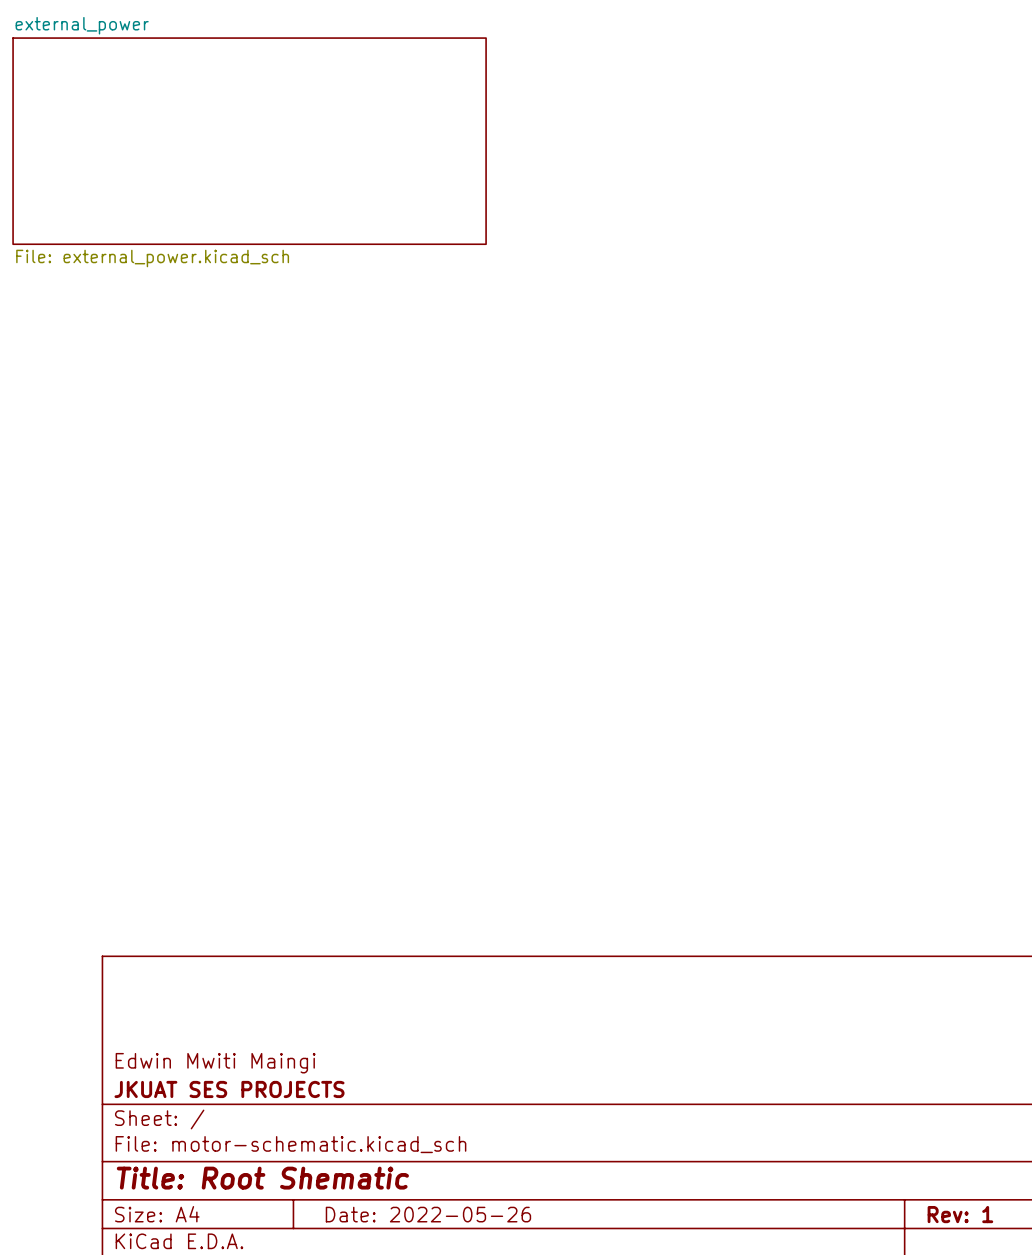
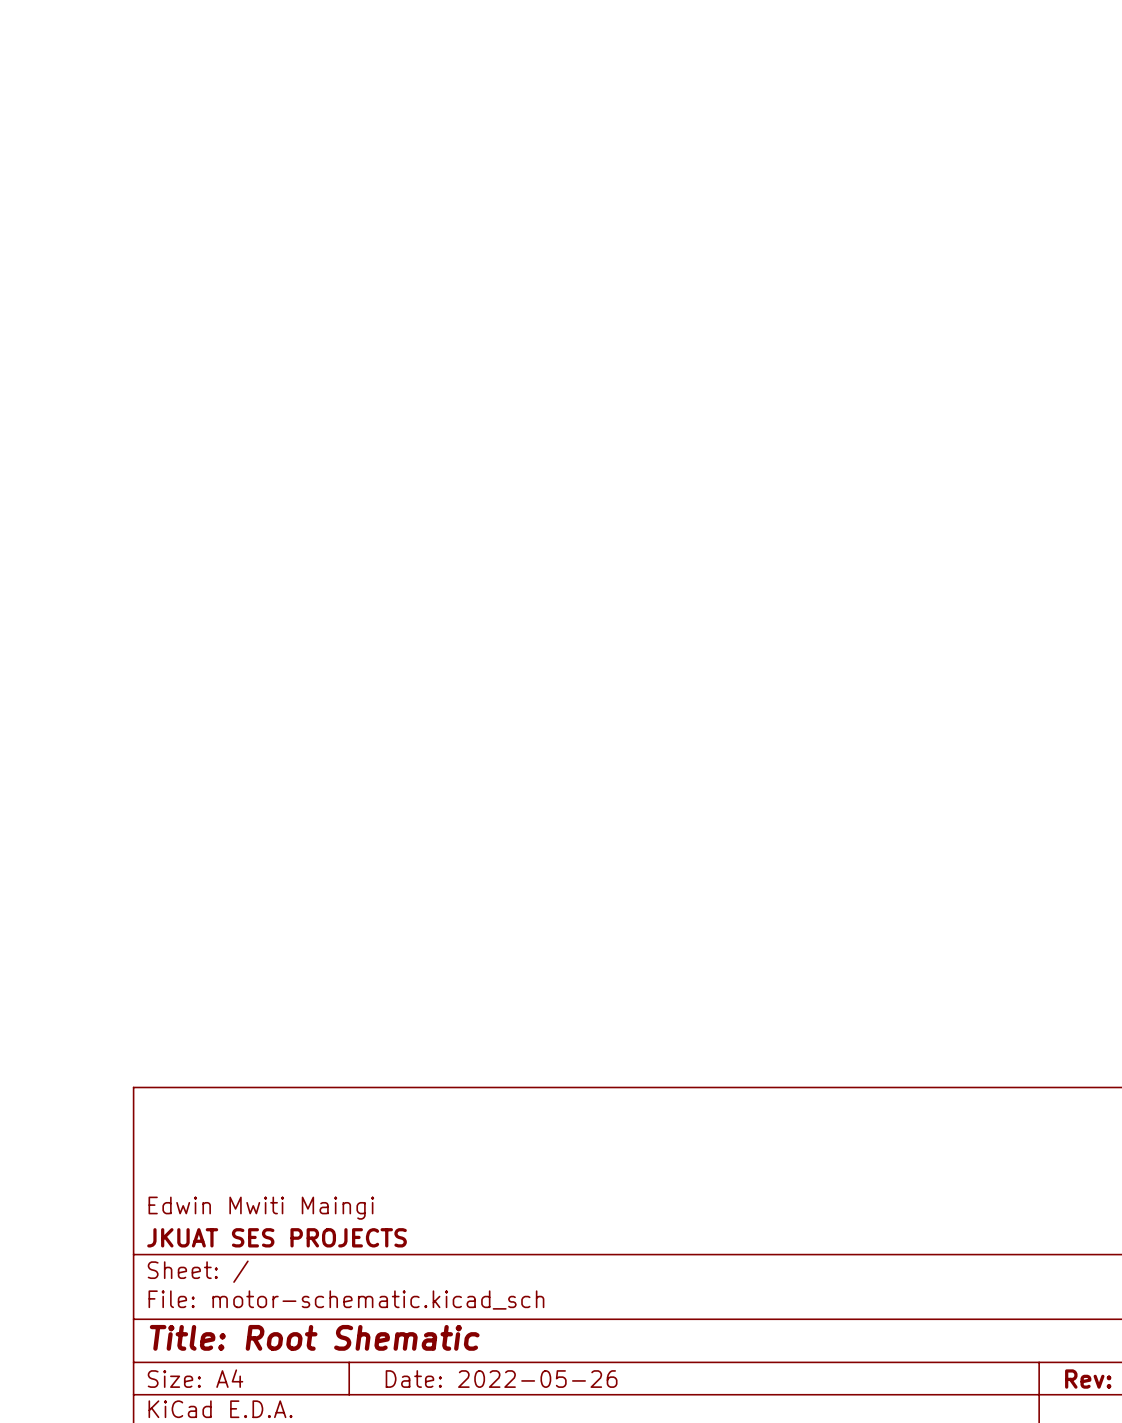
sheet external_power: File: external_power.kicad_sch (249, 141) -> none

